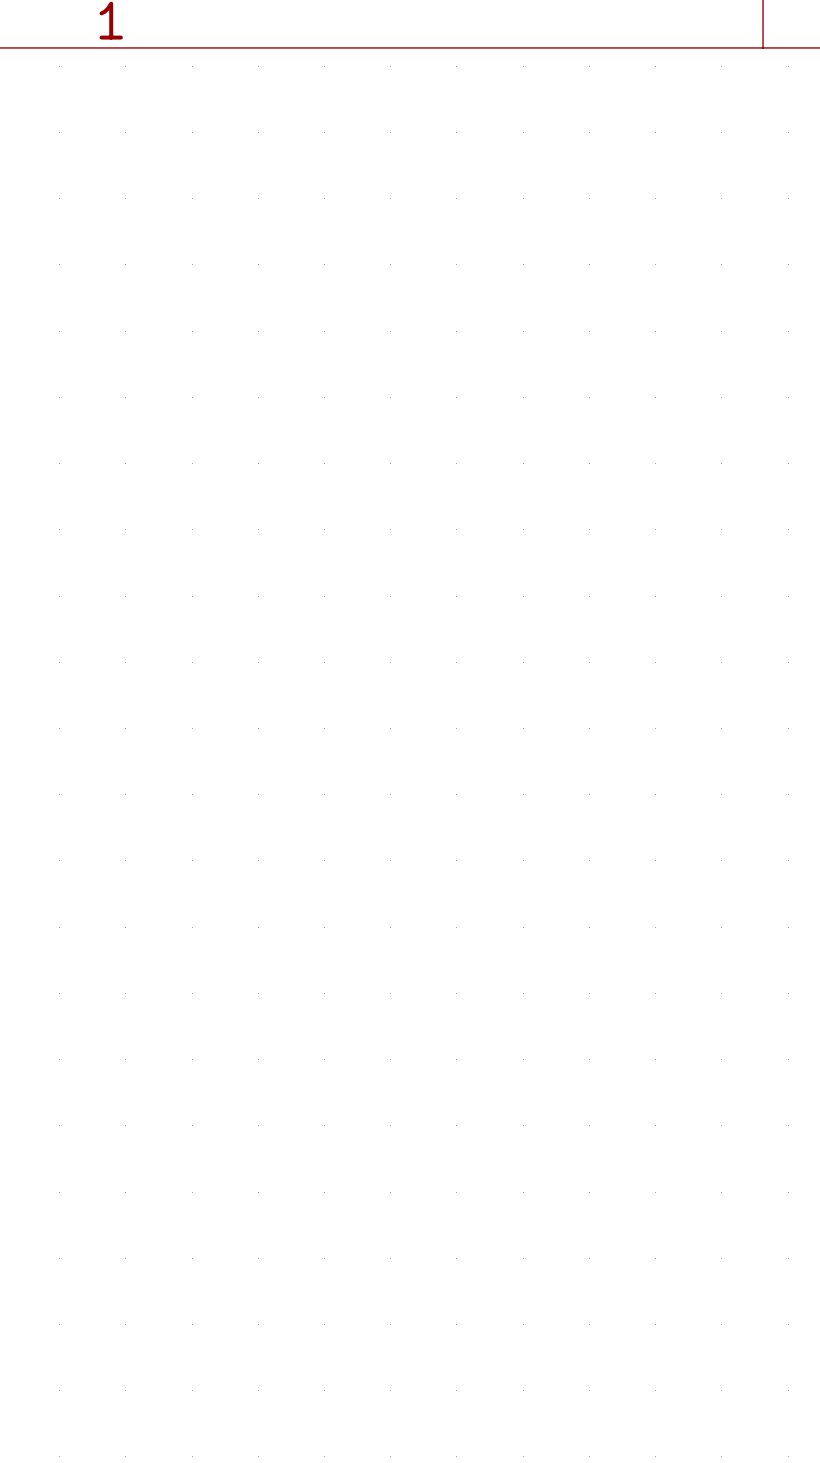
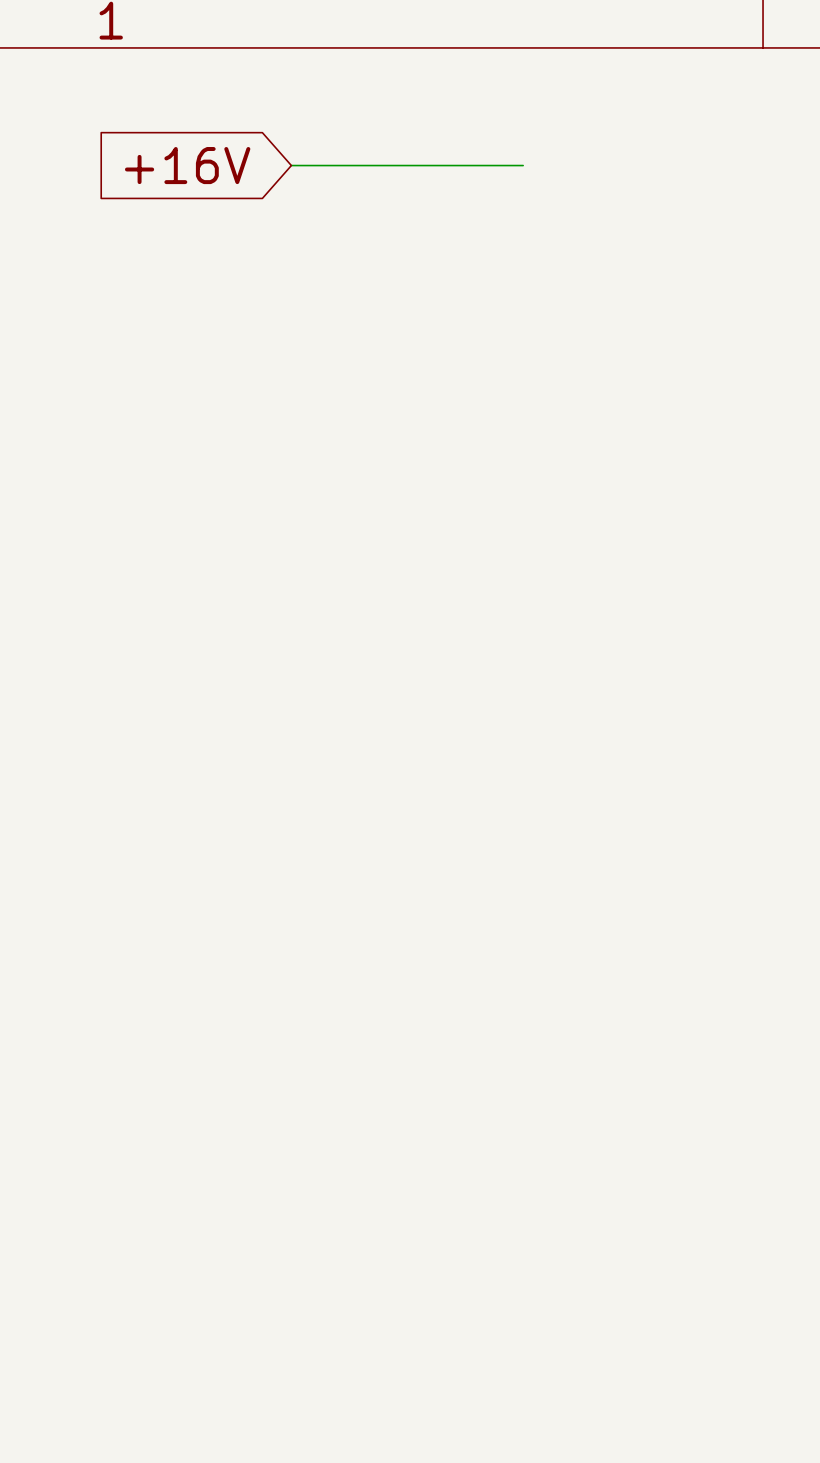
global label: none -> +16V (187, 165)
wire: none -> (291, 165) (523, 165)

